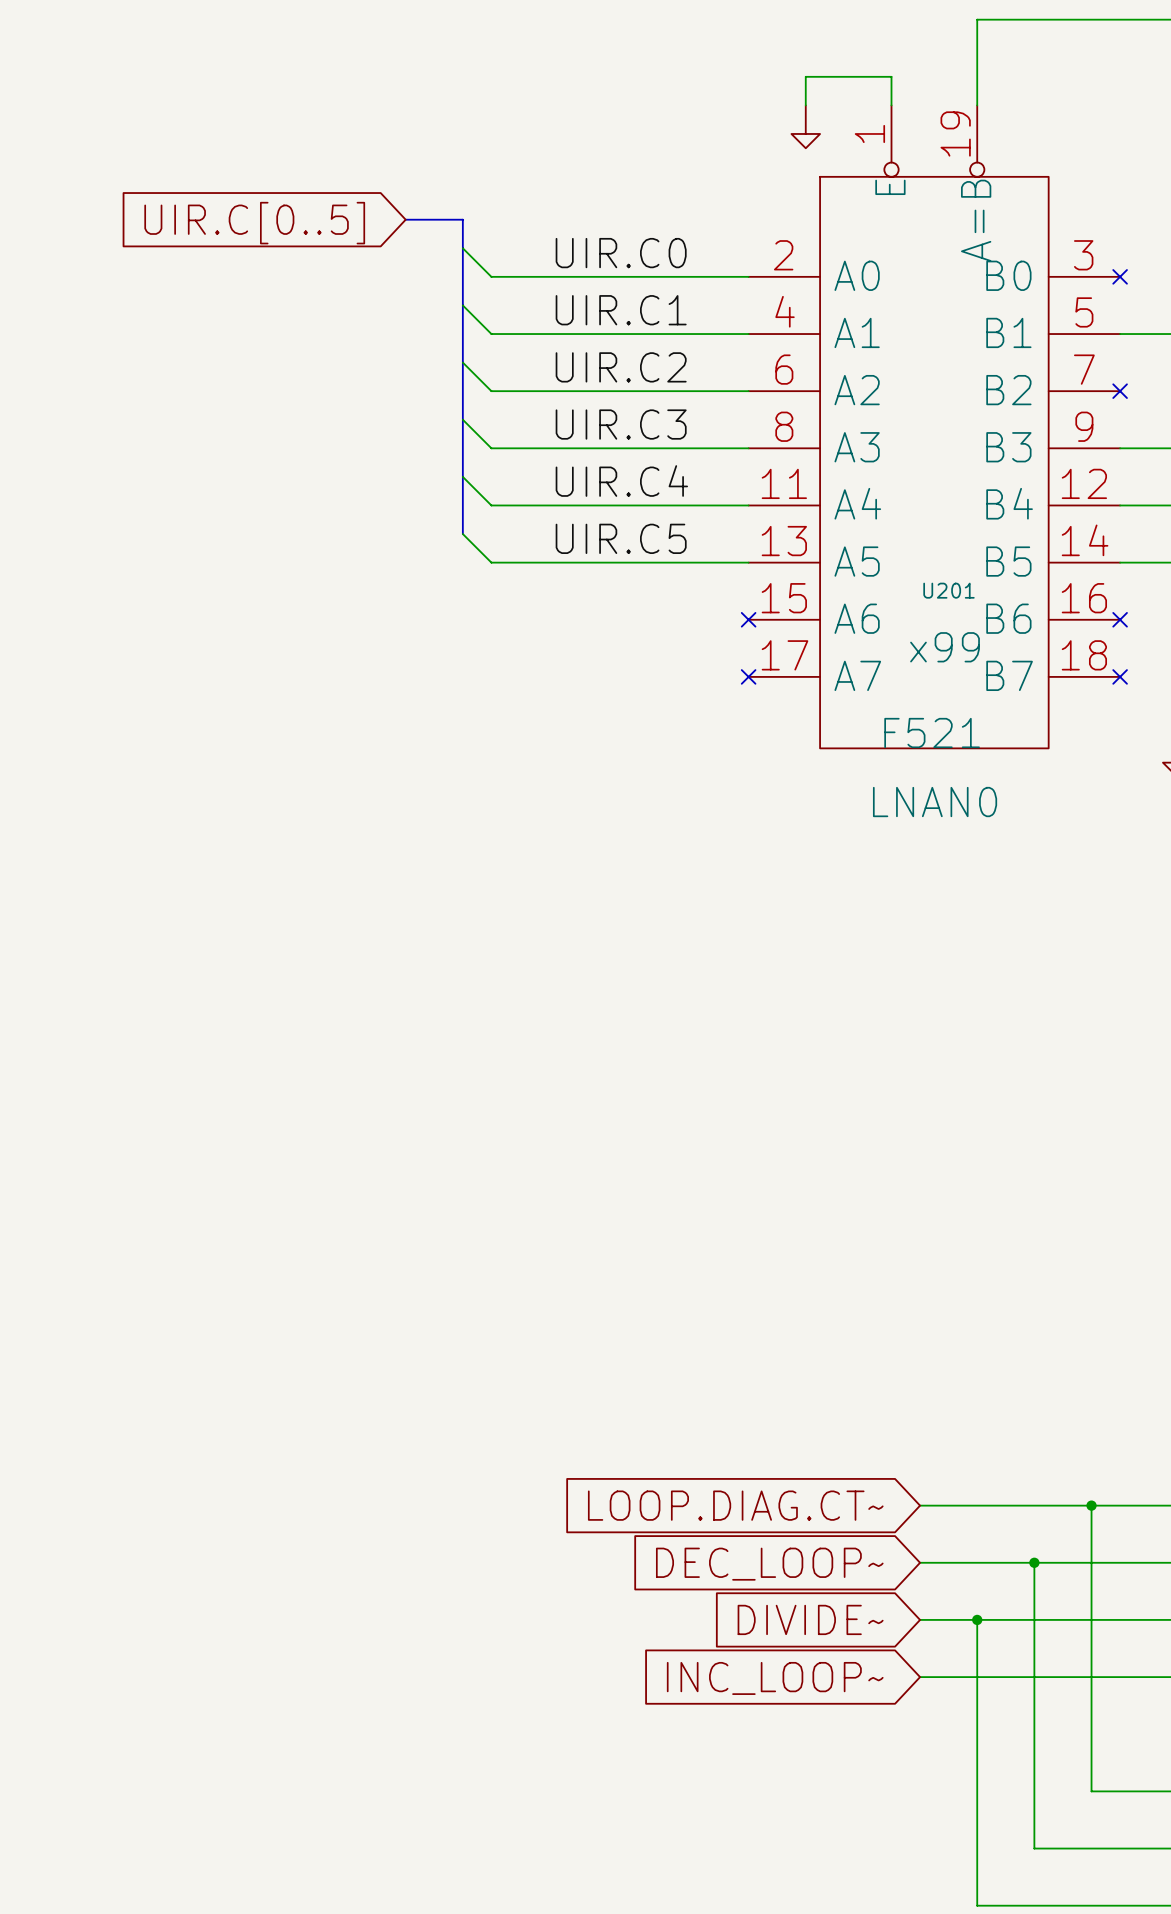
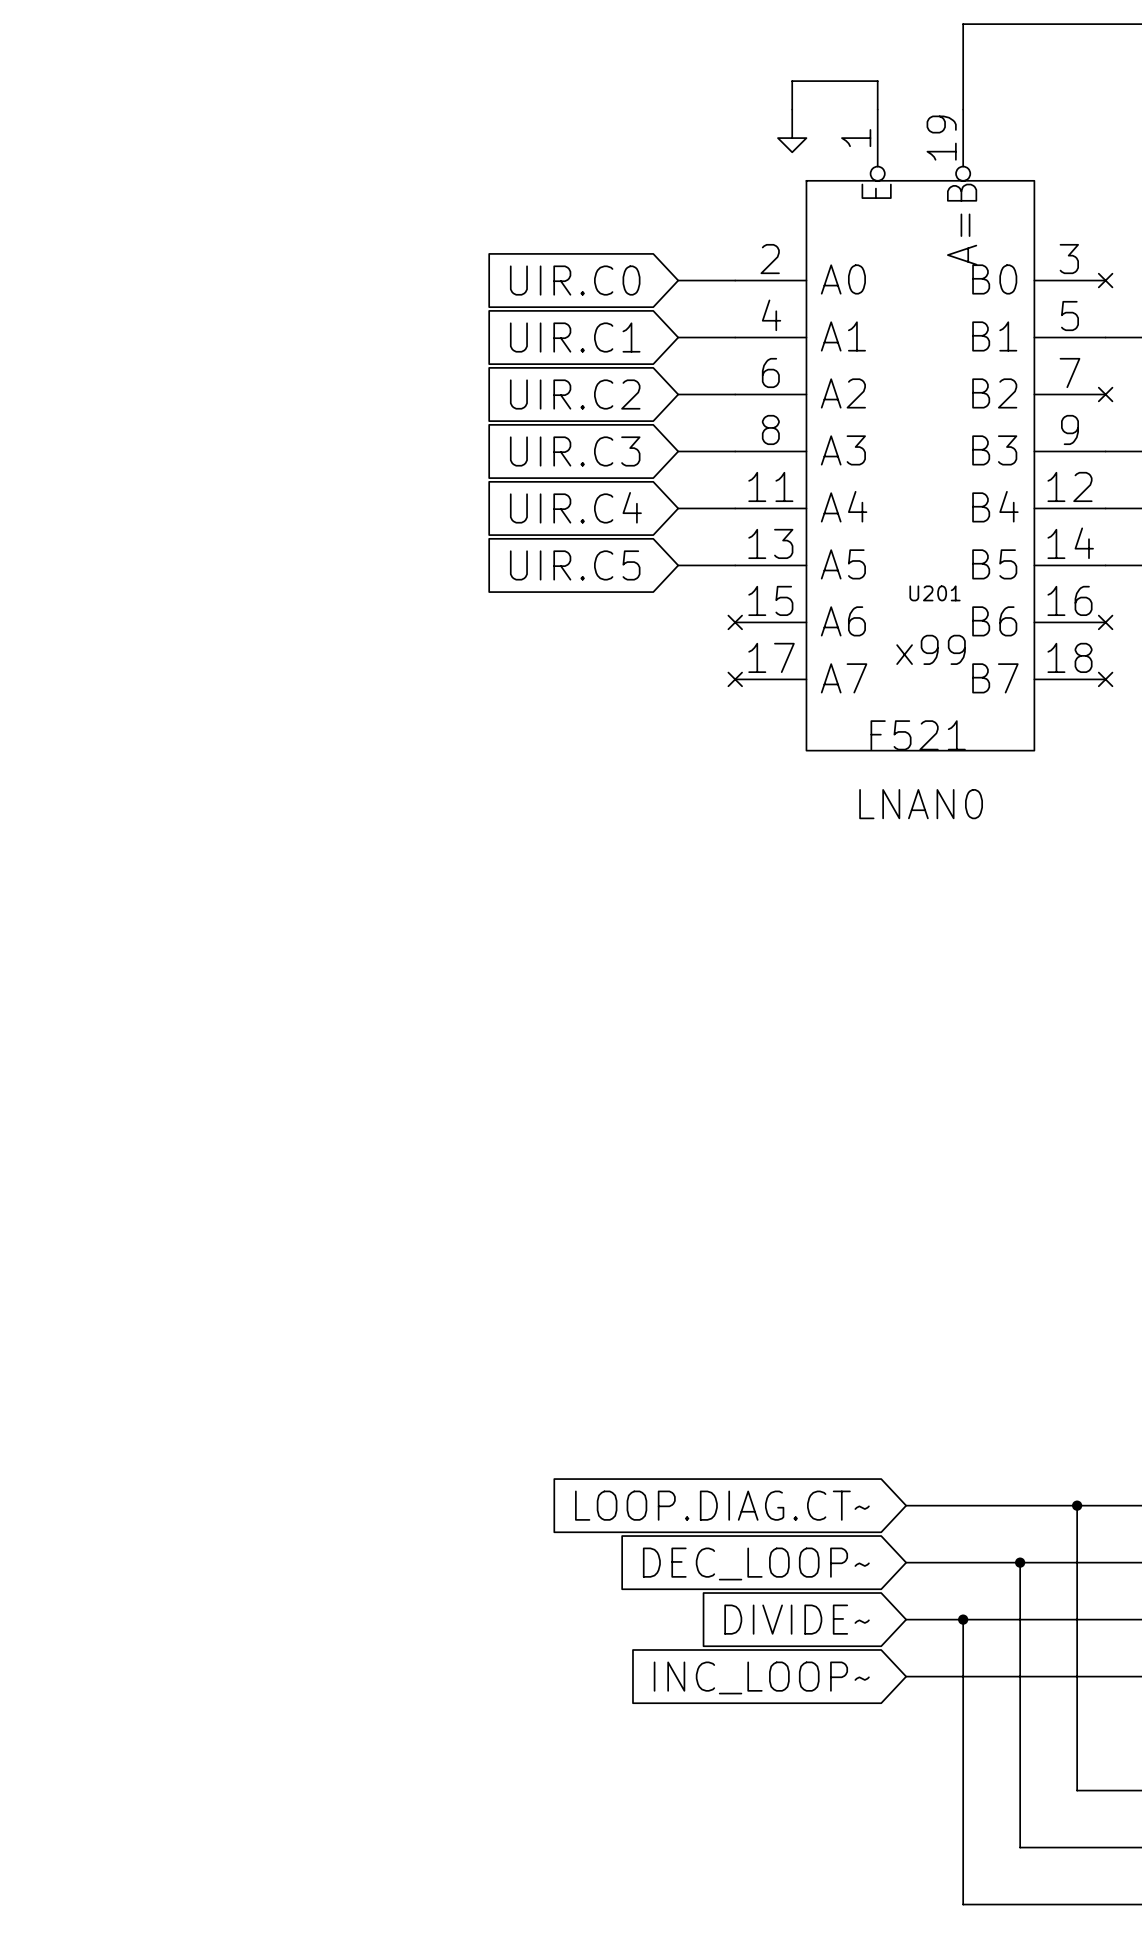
bus: (405, 219) (462, 219) (462, 534) -> none
global label: UIR.C[0..5] (254, 223) -> none
wire: (462, 248) (491, 276) (691, 276) -> none
label: UIR.C0 (621, 253) -> none
global label: none -> UIR.C0 (575, 280)
wire: (462, 305) (491, 334) (691, 334) -> none
label: UIR.C1 (621, 310) -> none
global label: none -> UIR.C1 (575, 337)
wire: (462, 362) (491, 391) (691, 391) -> none
label: UIR.C2 (621, 367) -> none
global label: none -> UIR.C2 (575, 394)
wire: (462, 419) (491, 448) (691, 448) -> none
label: UIR.C3 (621, 424) -> none
global label: none -> UIR.C3 (575, 451)
wire: (462, 476) (491, 505) (691, 505) -> none
label: UIR.C4 (621, 481) -> none
global label: none -> UIR.C4 (575, 507)
wire: (462, 534) (491, 562) (691, 562) -> none
label: UIR.C5 (621, 538) -> none
global label: none -> UIR.C5 (575, 565)

